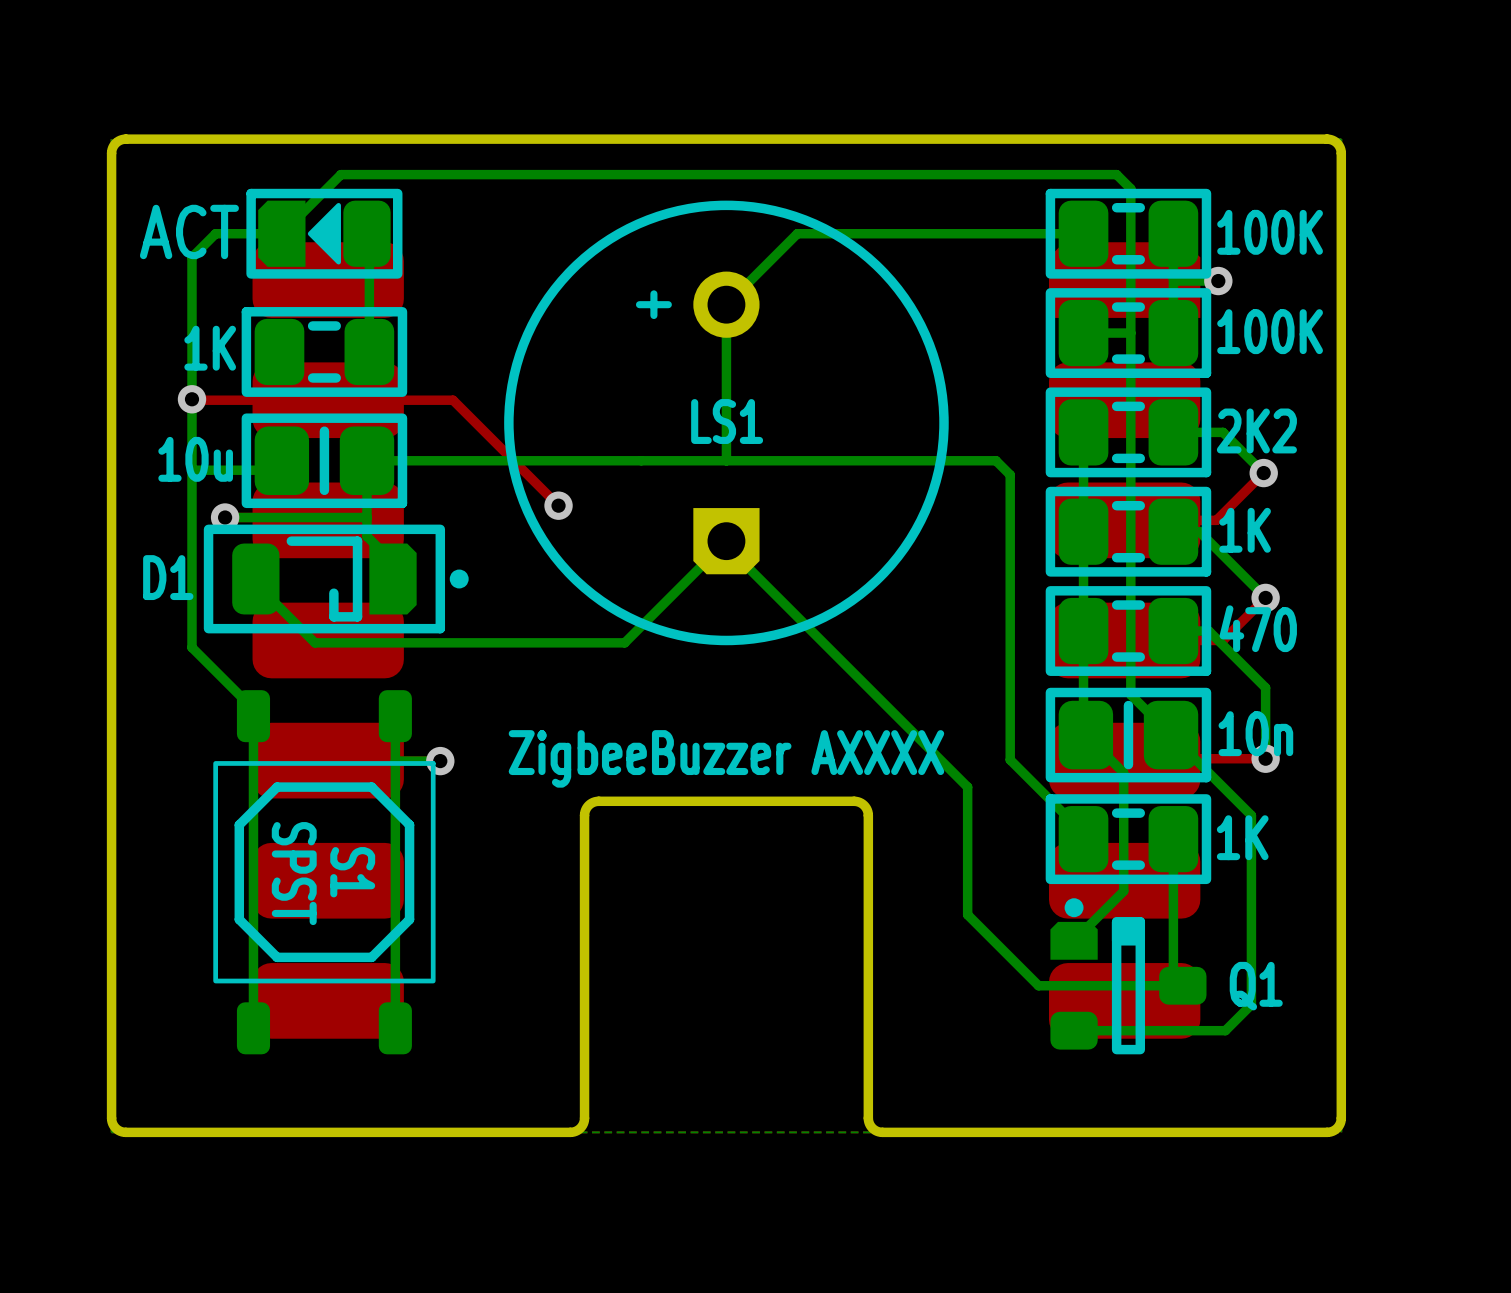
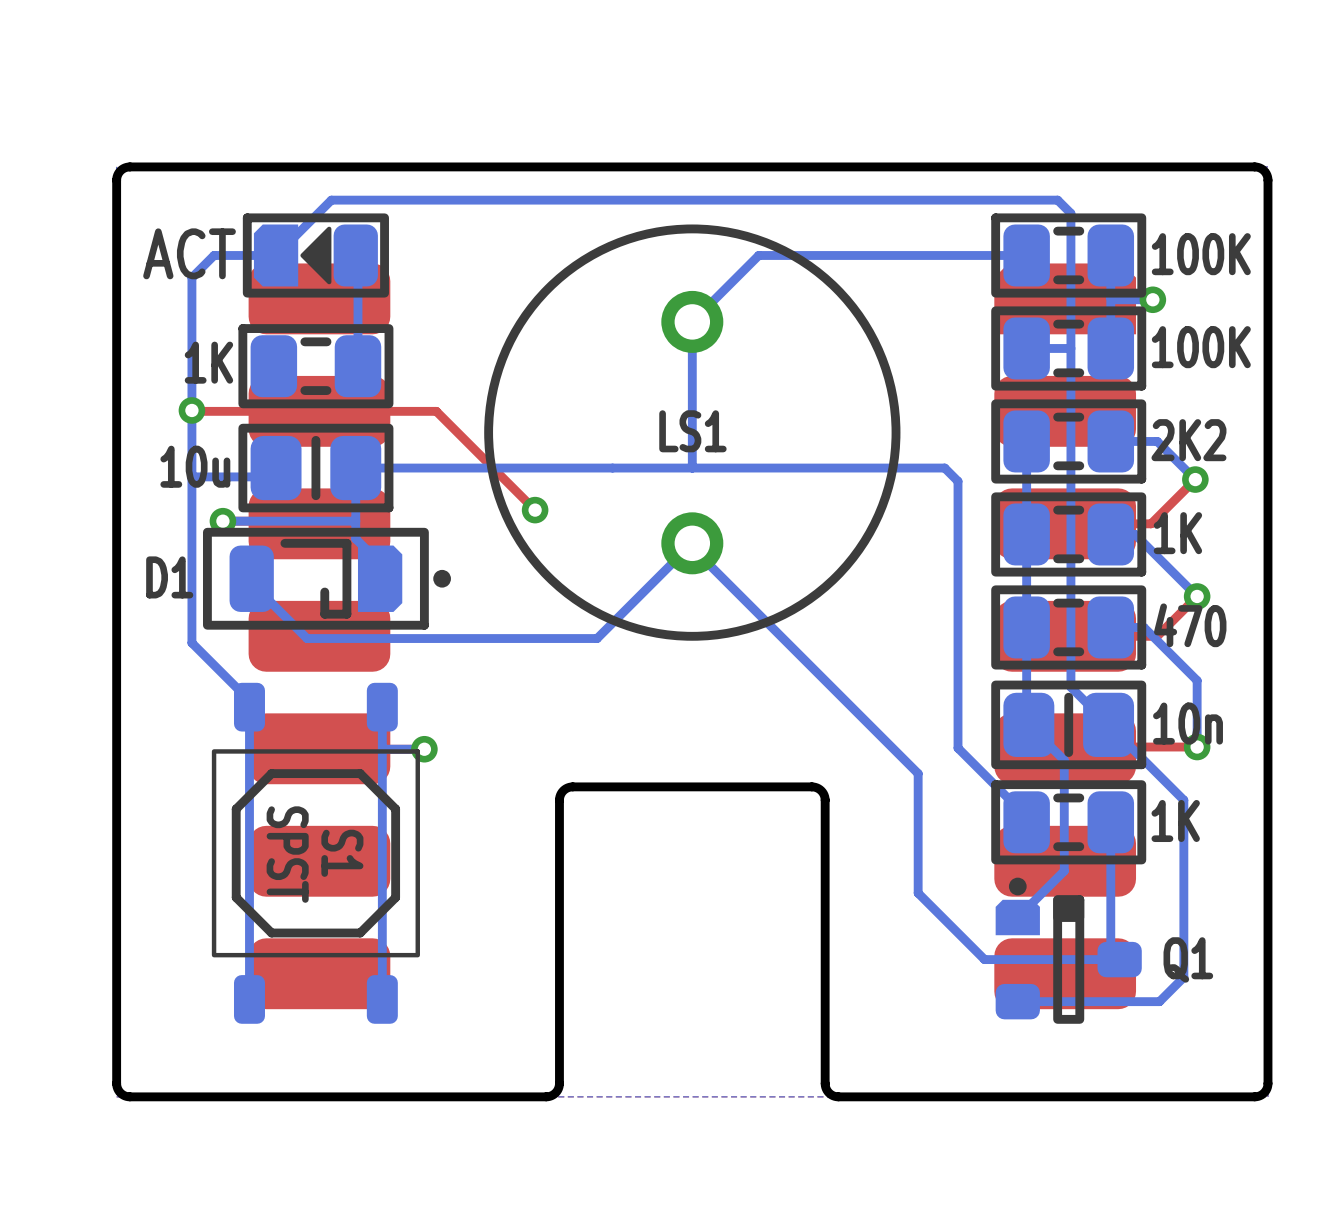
LS1 footprint: [504, 200, 949, 646] -> [484, 224, 901, 641]
text: ZigbeeBuzzer AXXXX (726, 758) -> none

